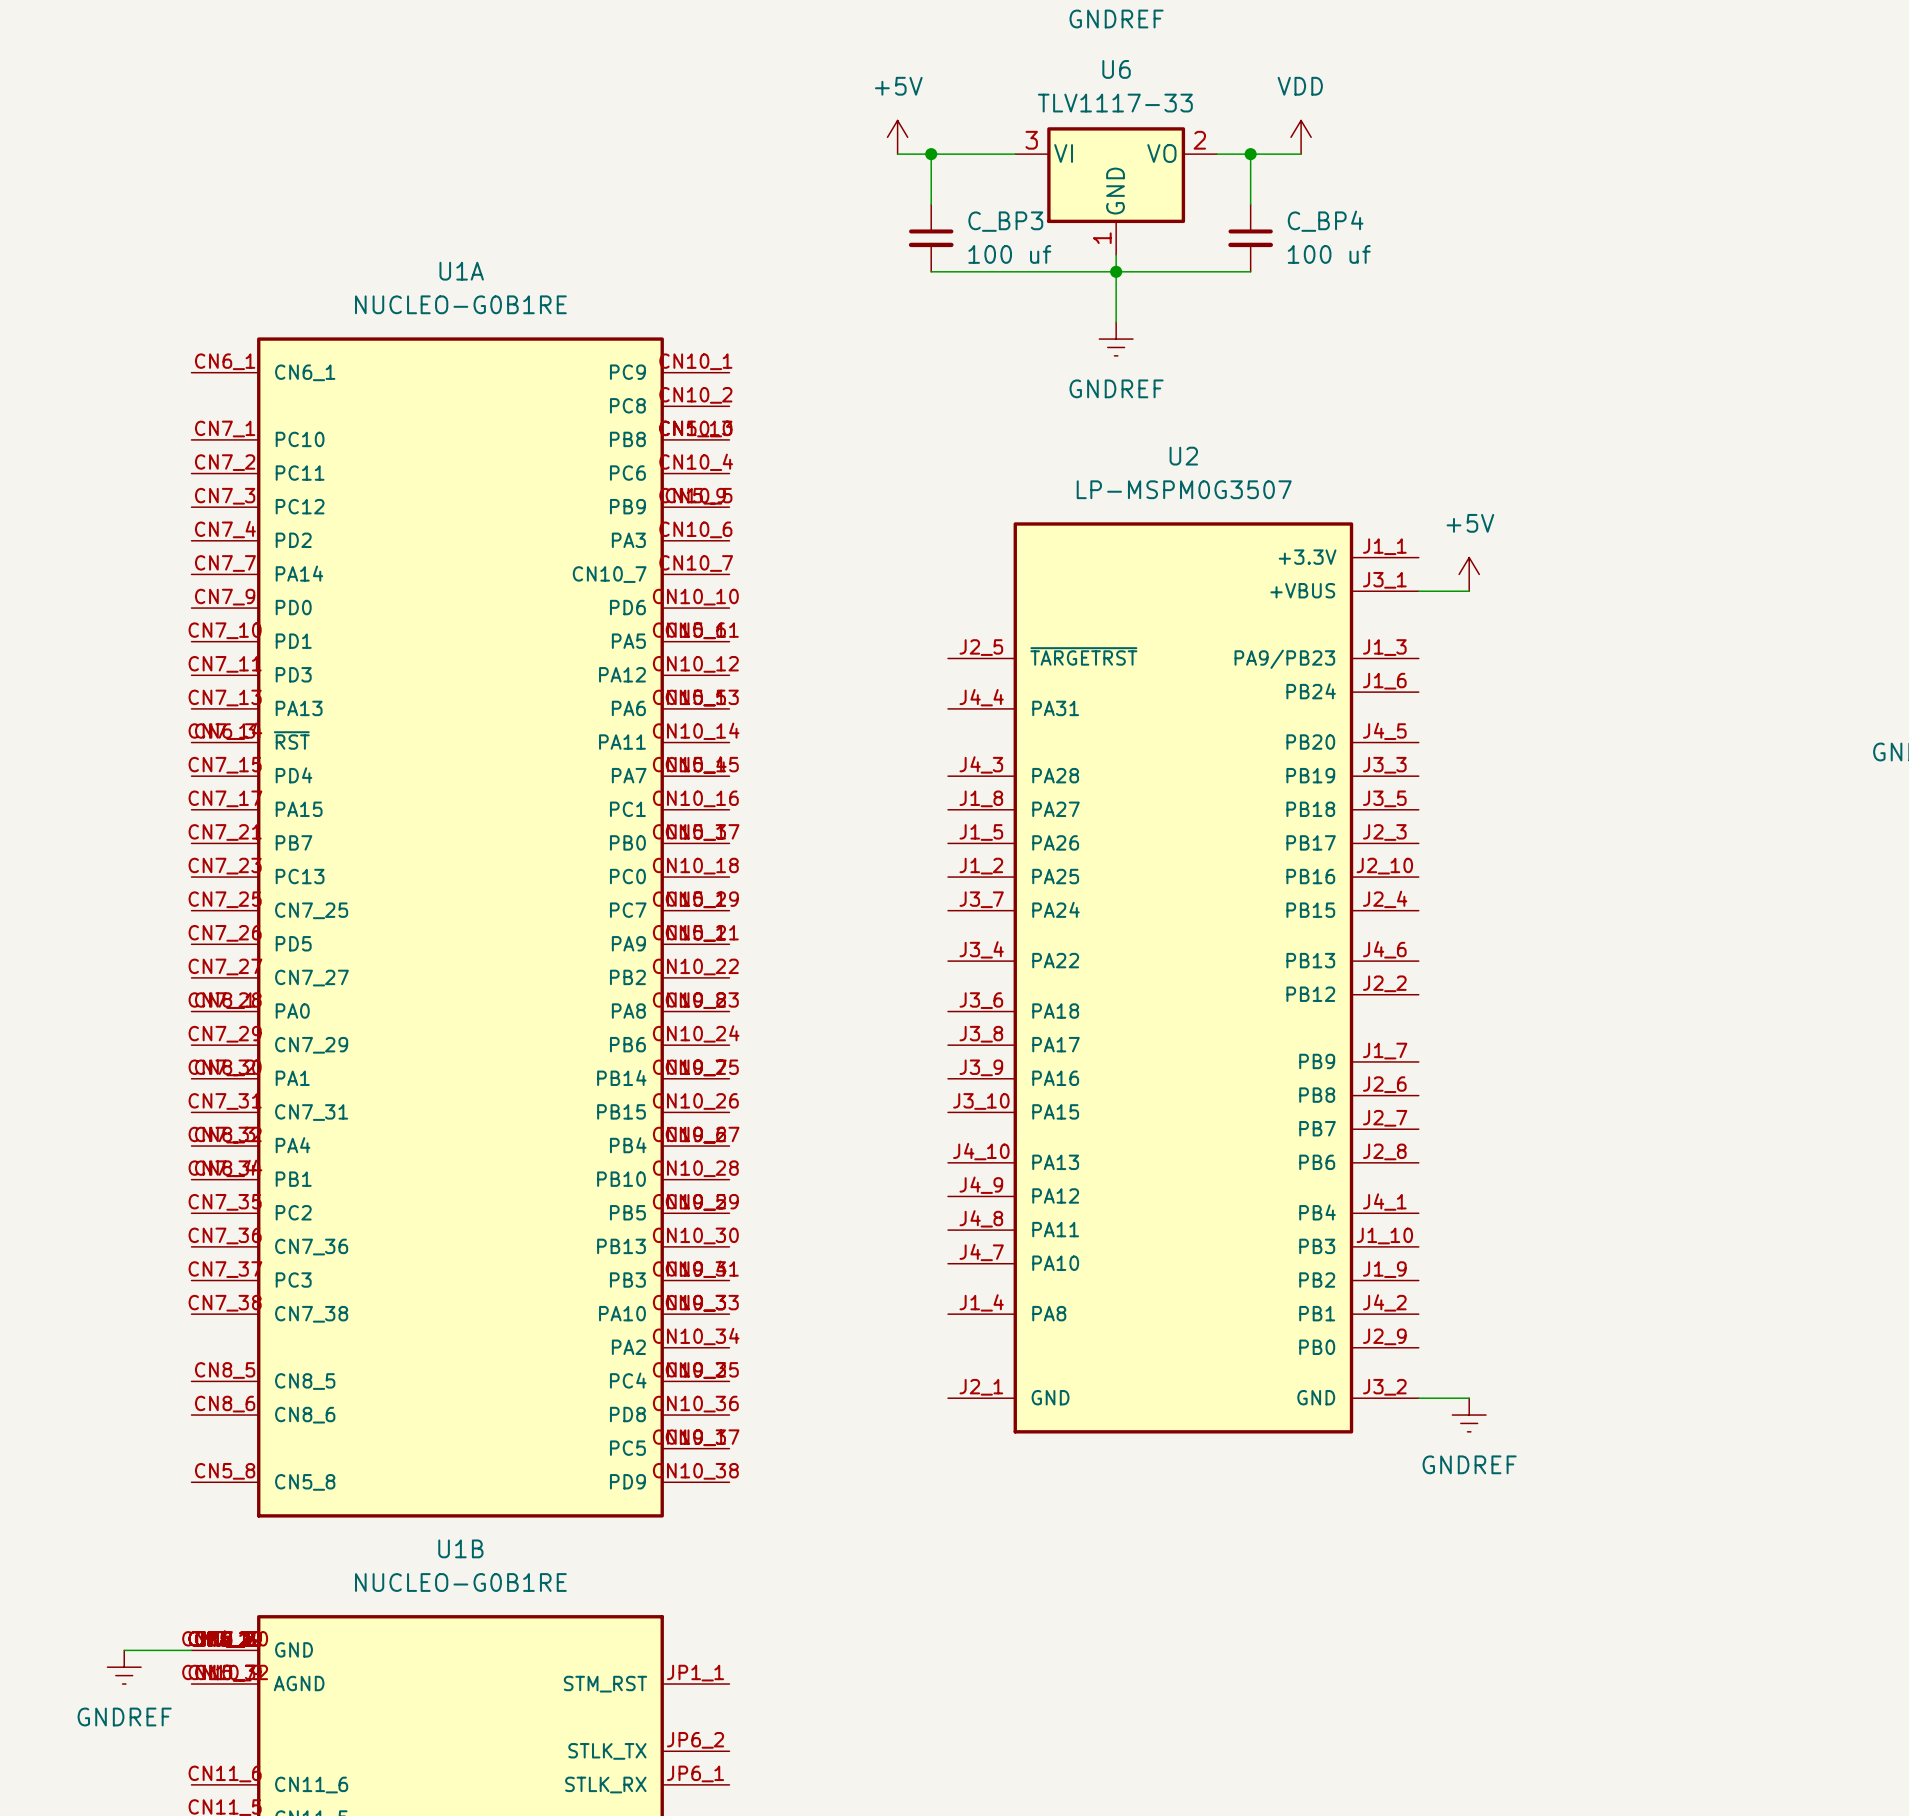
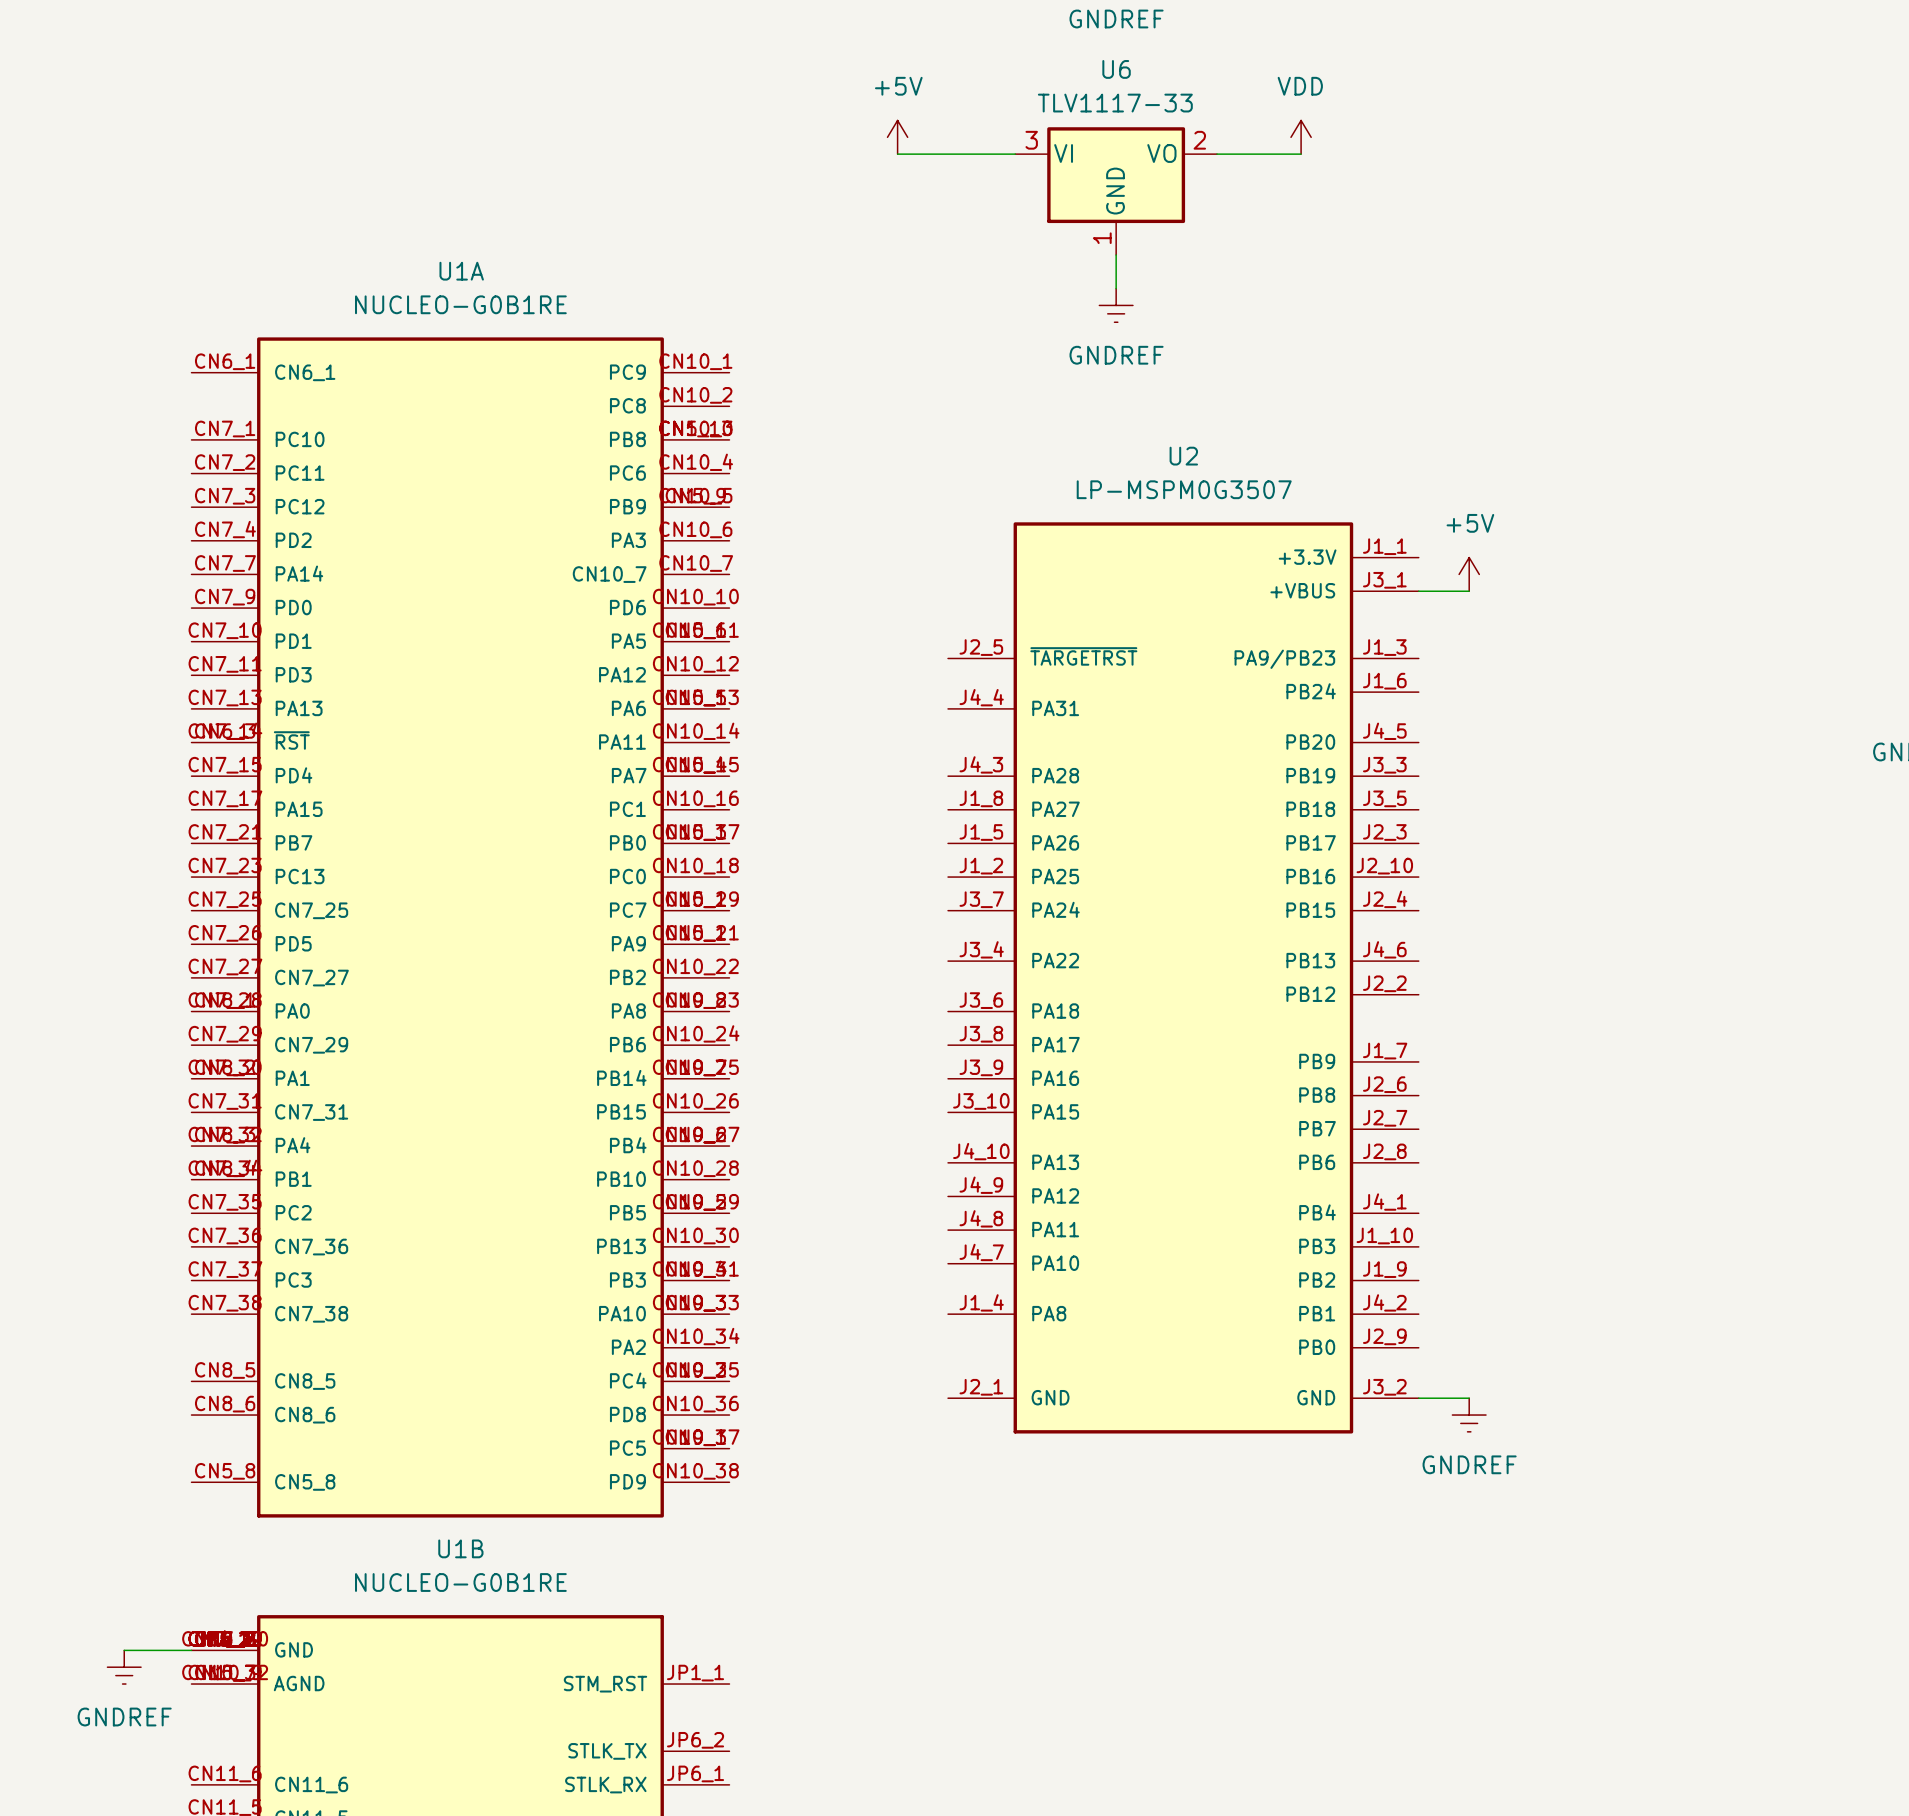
wire: (931, 154) (931, 204) -> none
junction: (931, 154) -> none
wire: (1250, 154) (1250, 204) -> none
junction: (1250, 154) -> none
C_BP3: 100 uf (931, 238) -> none
C_BP4: 100 uf (1250, 238) -> none
wire: (931, 271) (1250, 271) -> none
junction: (1116, 271) -> none
power symbol position: GNDREF (1116, 339) -> GNDREF (1116, 305)

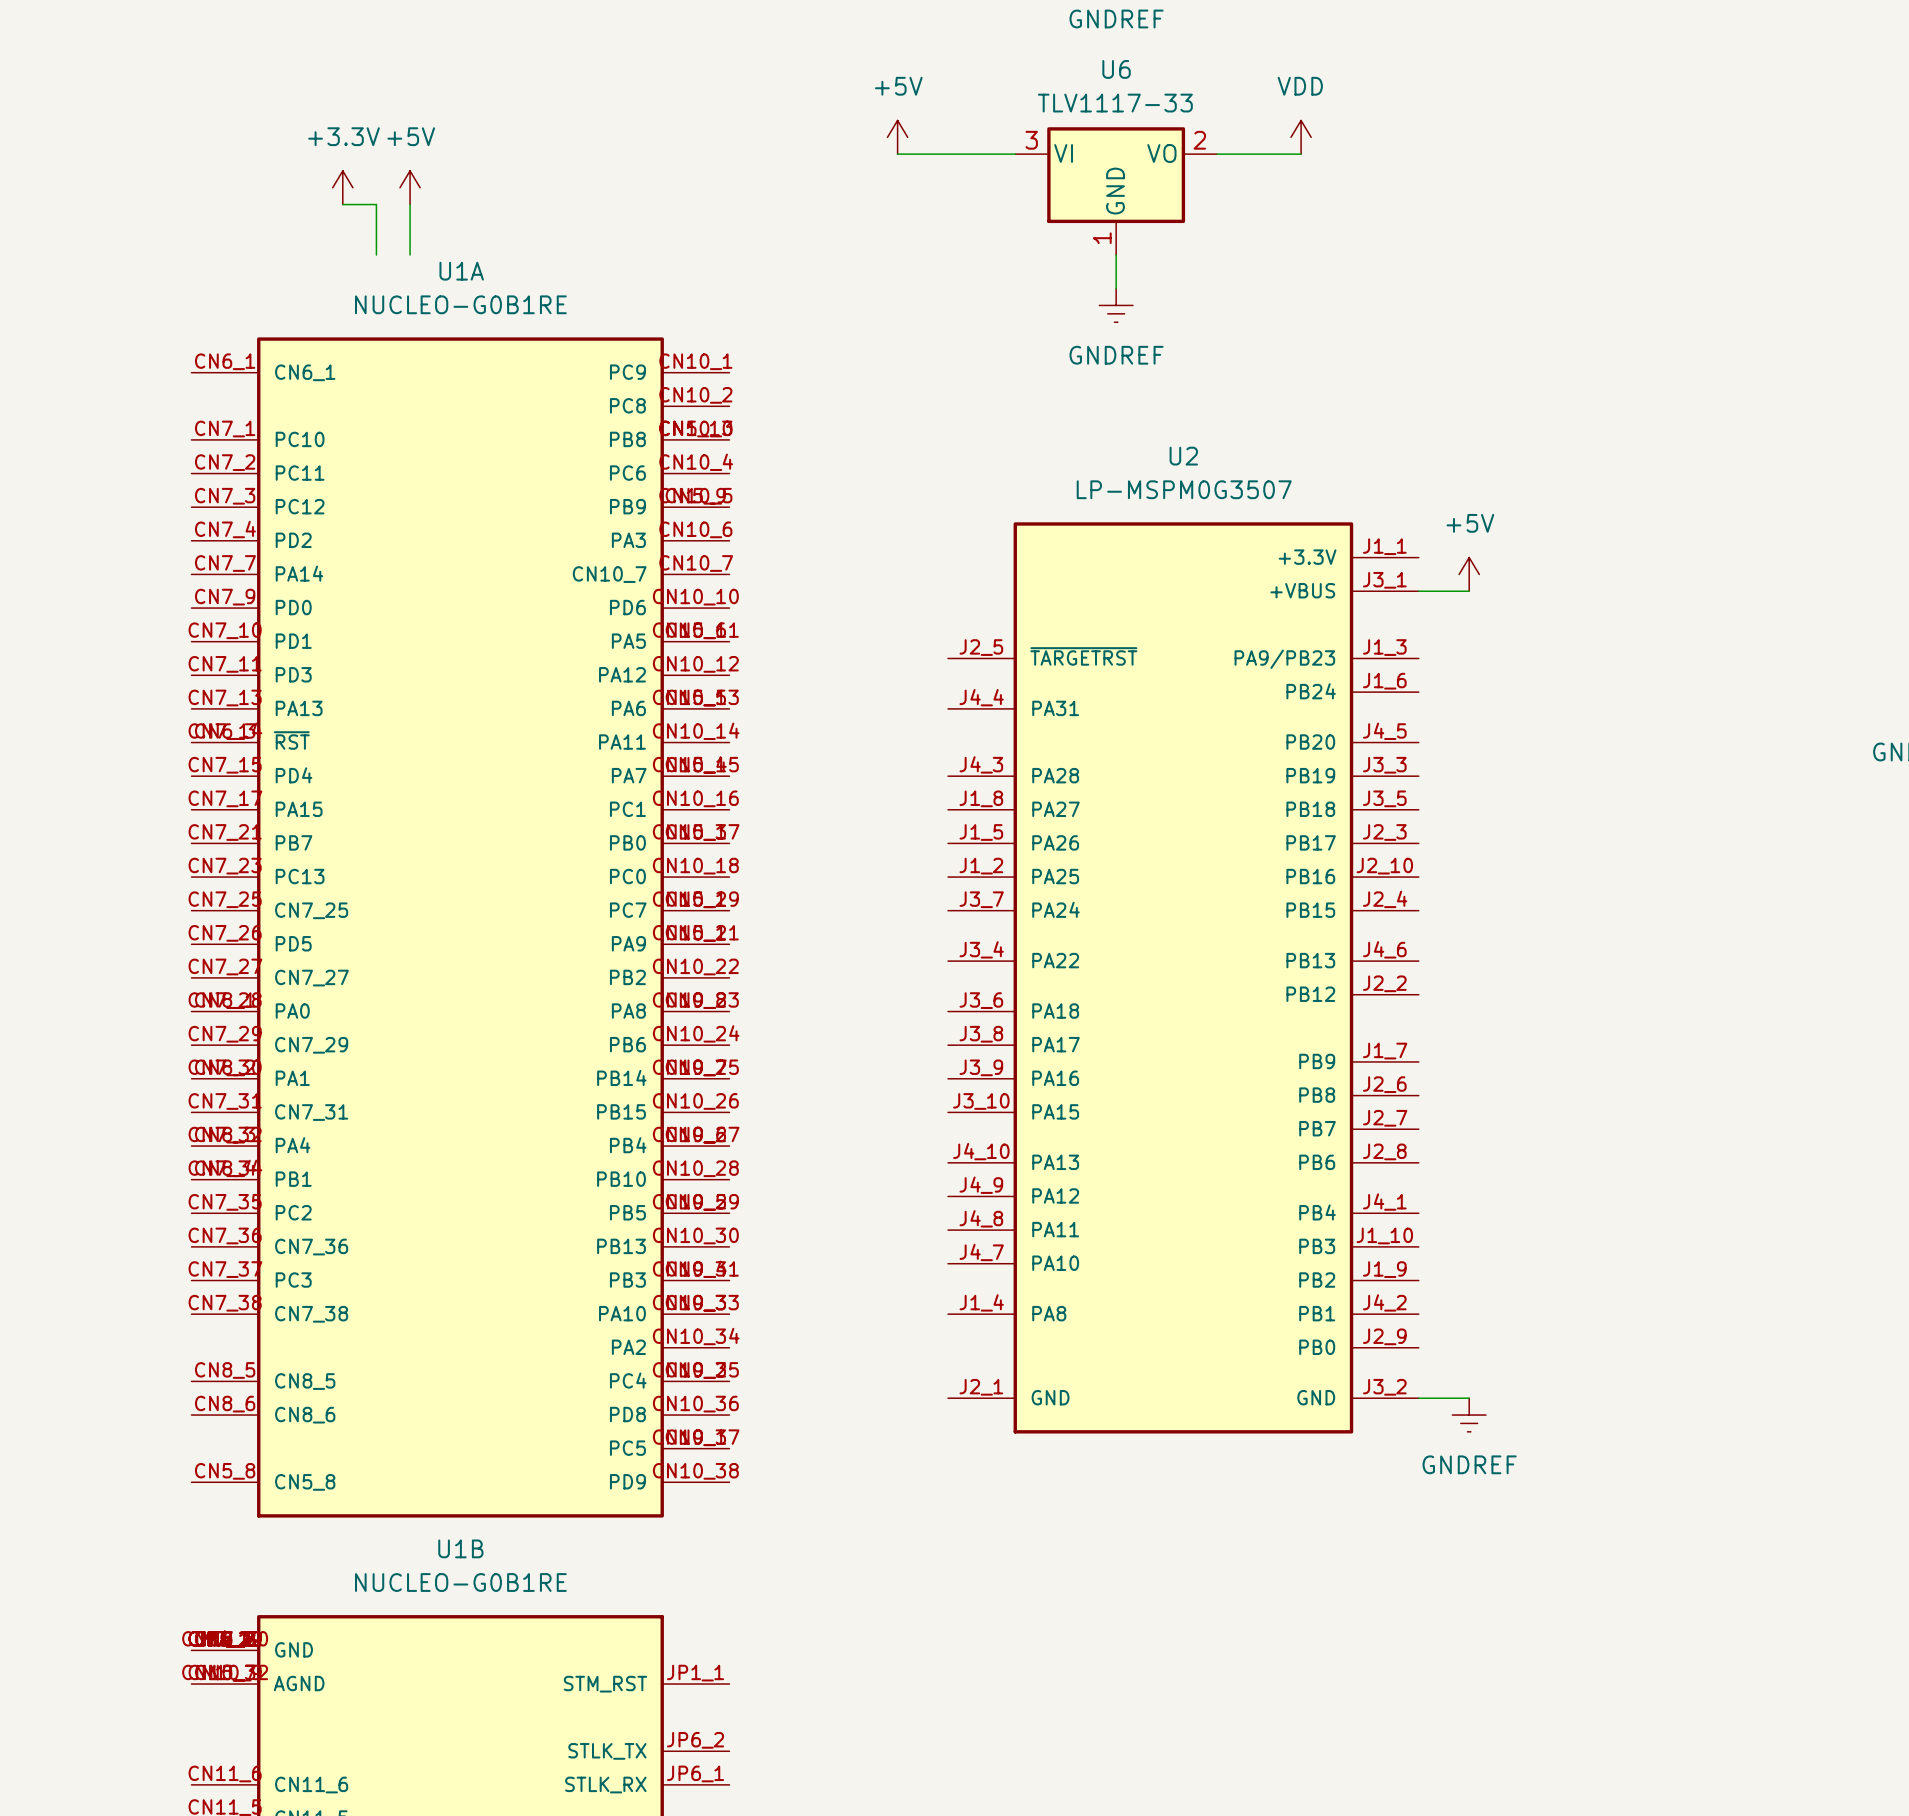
power symbol: none -> +3.3V (342, 187)
power symbol: none -> +5V (410, 187)
wire: none -> (342, 204) (376, 204) (376, 254)
wire: none -> (410, 204) (410, 254)
wire: (124, 1650) (191, 1650) -> none
power symbol: GNDREF (124, 1667) -> none

